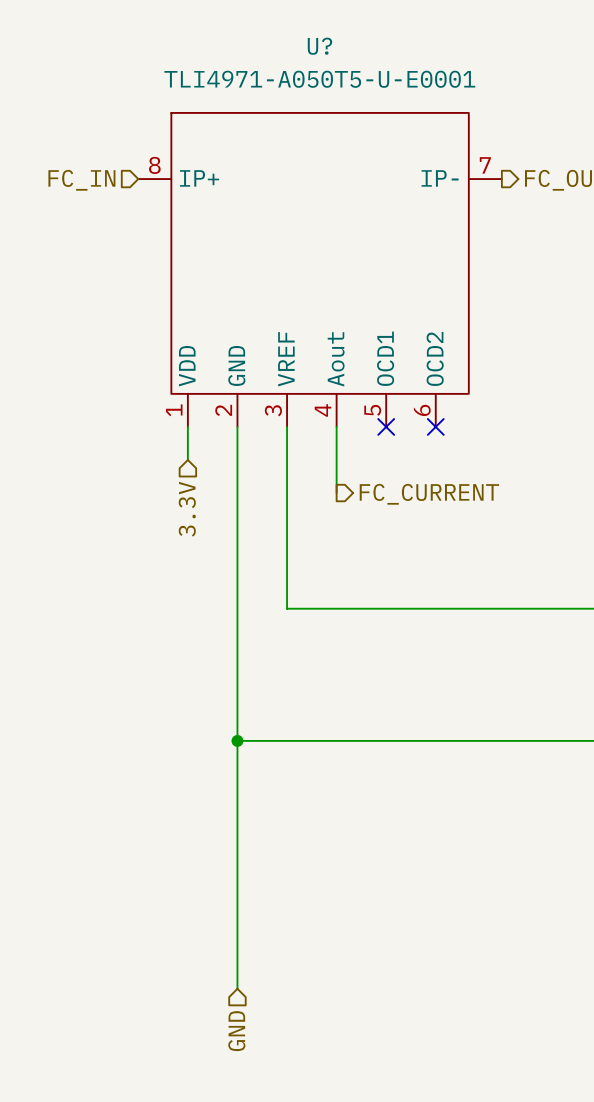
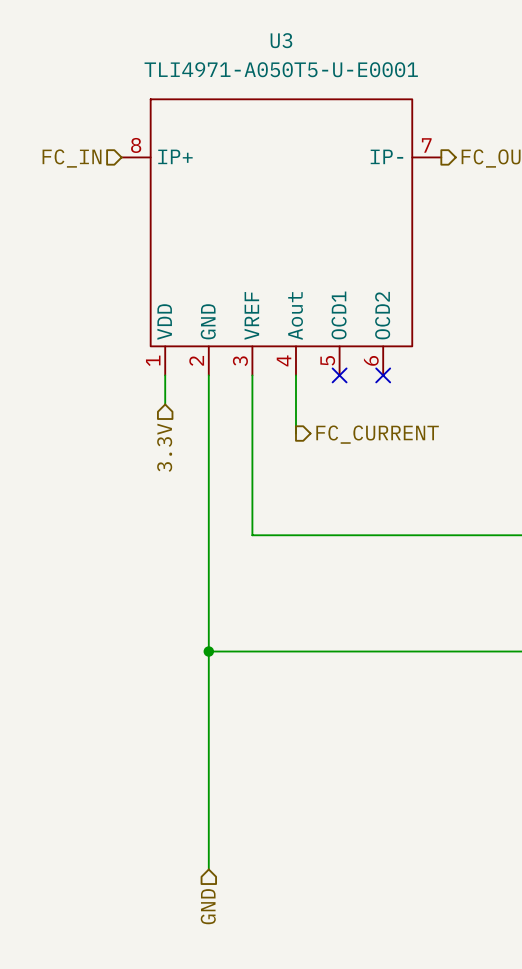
U? name: U? (319, 46) -> U3 (281, 40)

